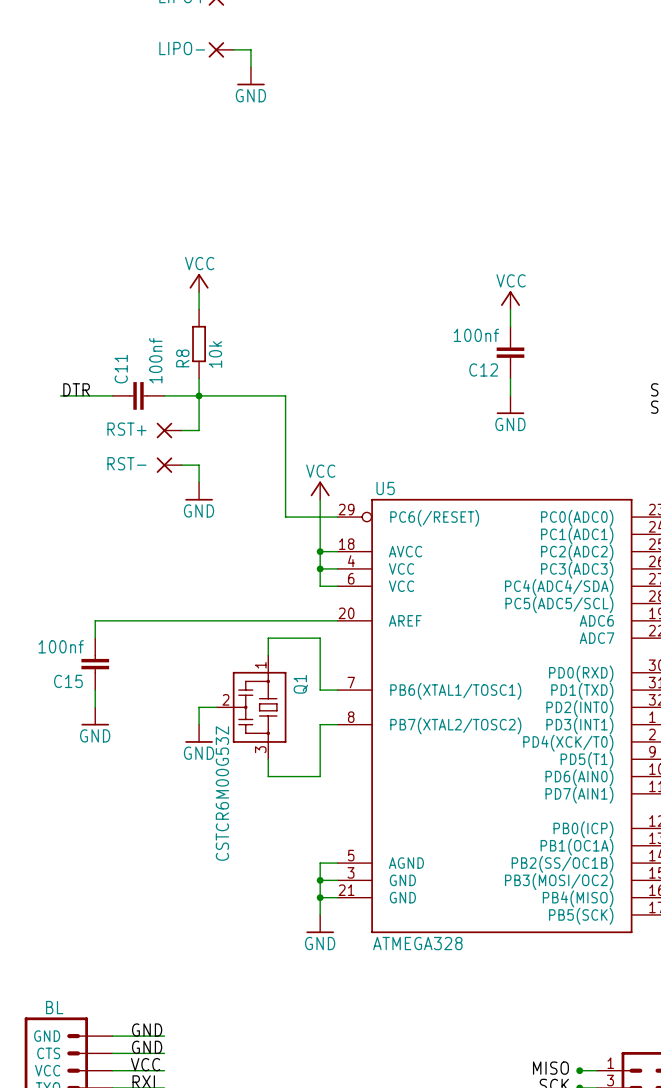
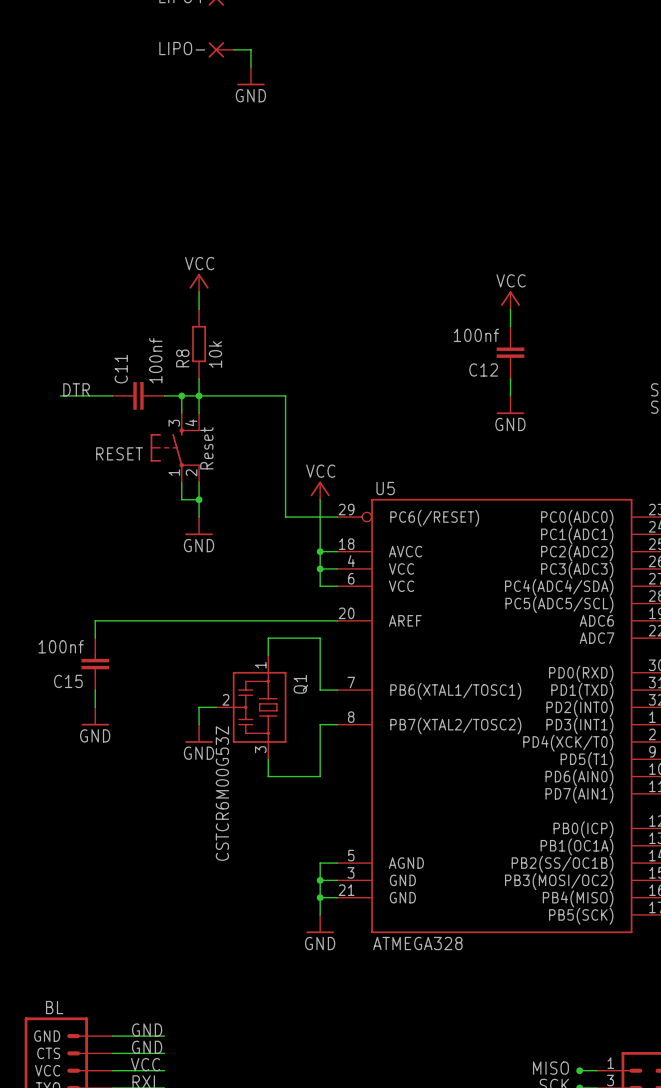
wire: none -> (181, 395) (181, 413)
junction: none -> (181, 395)
RST+: (169, 430) -> none
RESET: none -> Reset (175, 447)
RST-: (169, 465) -> none
wire: none -> (181, 482) (181, 499) (199, 499)
power symbol position: GND (199, 491) -> GND (199, 526)
junction: none -> (199, 499)

